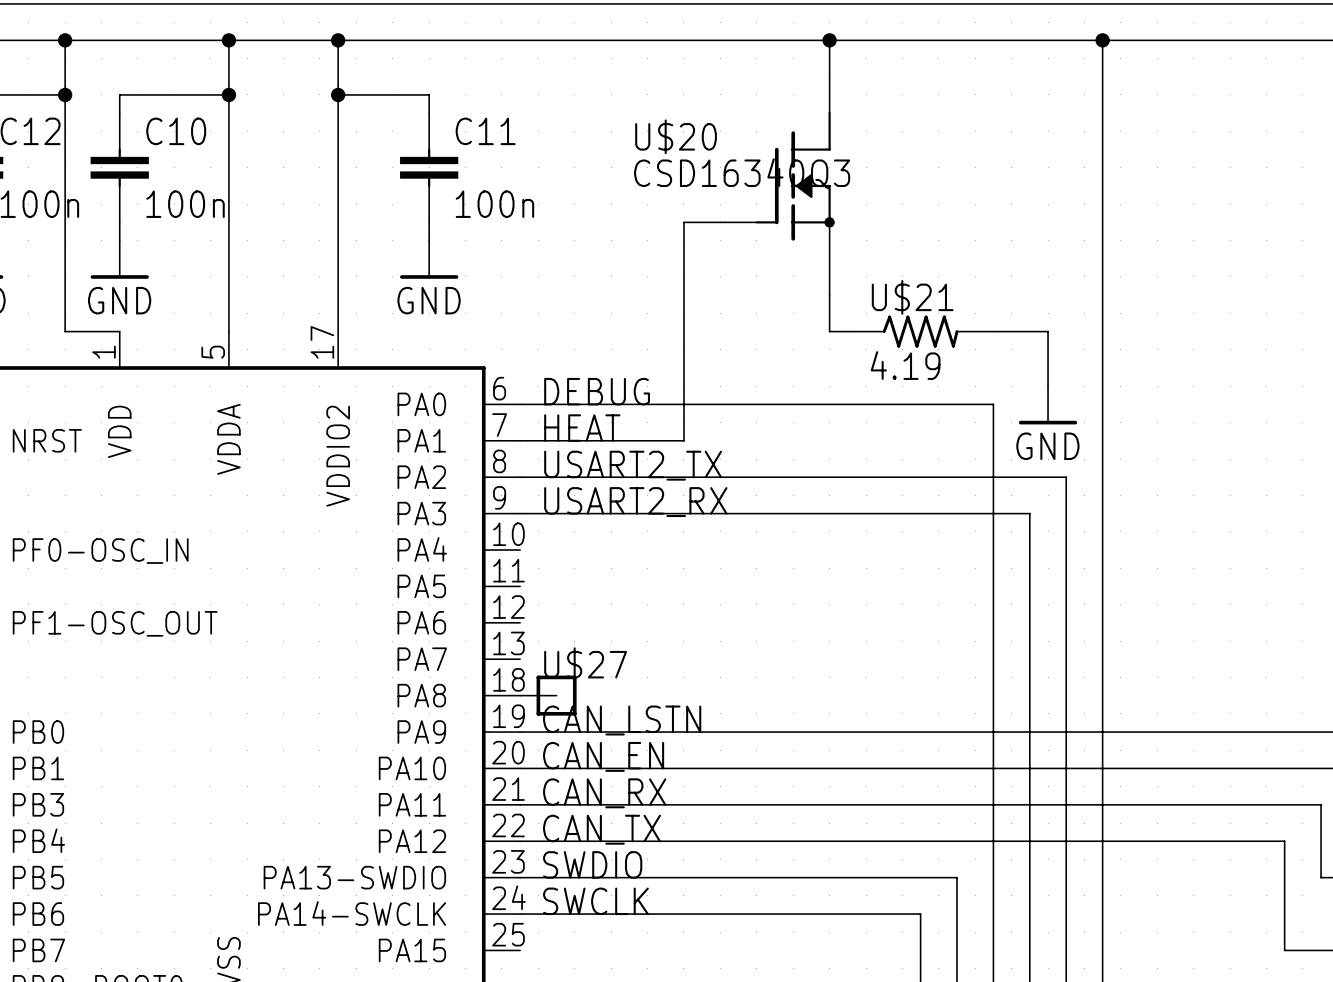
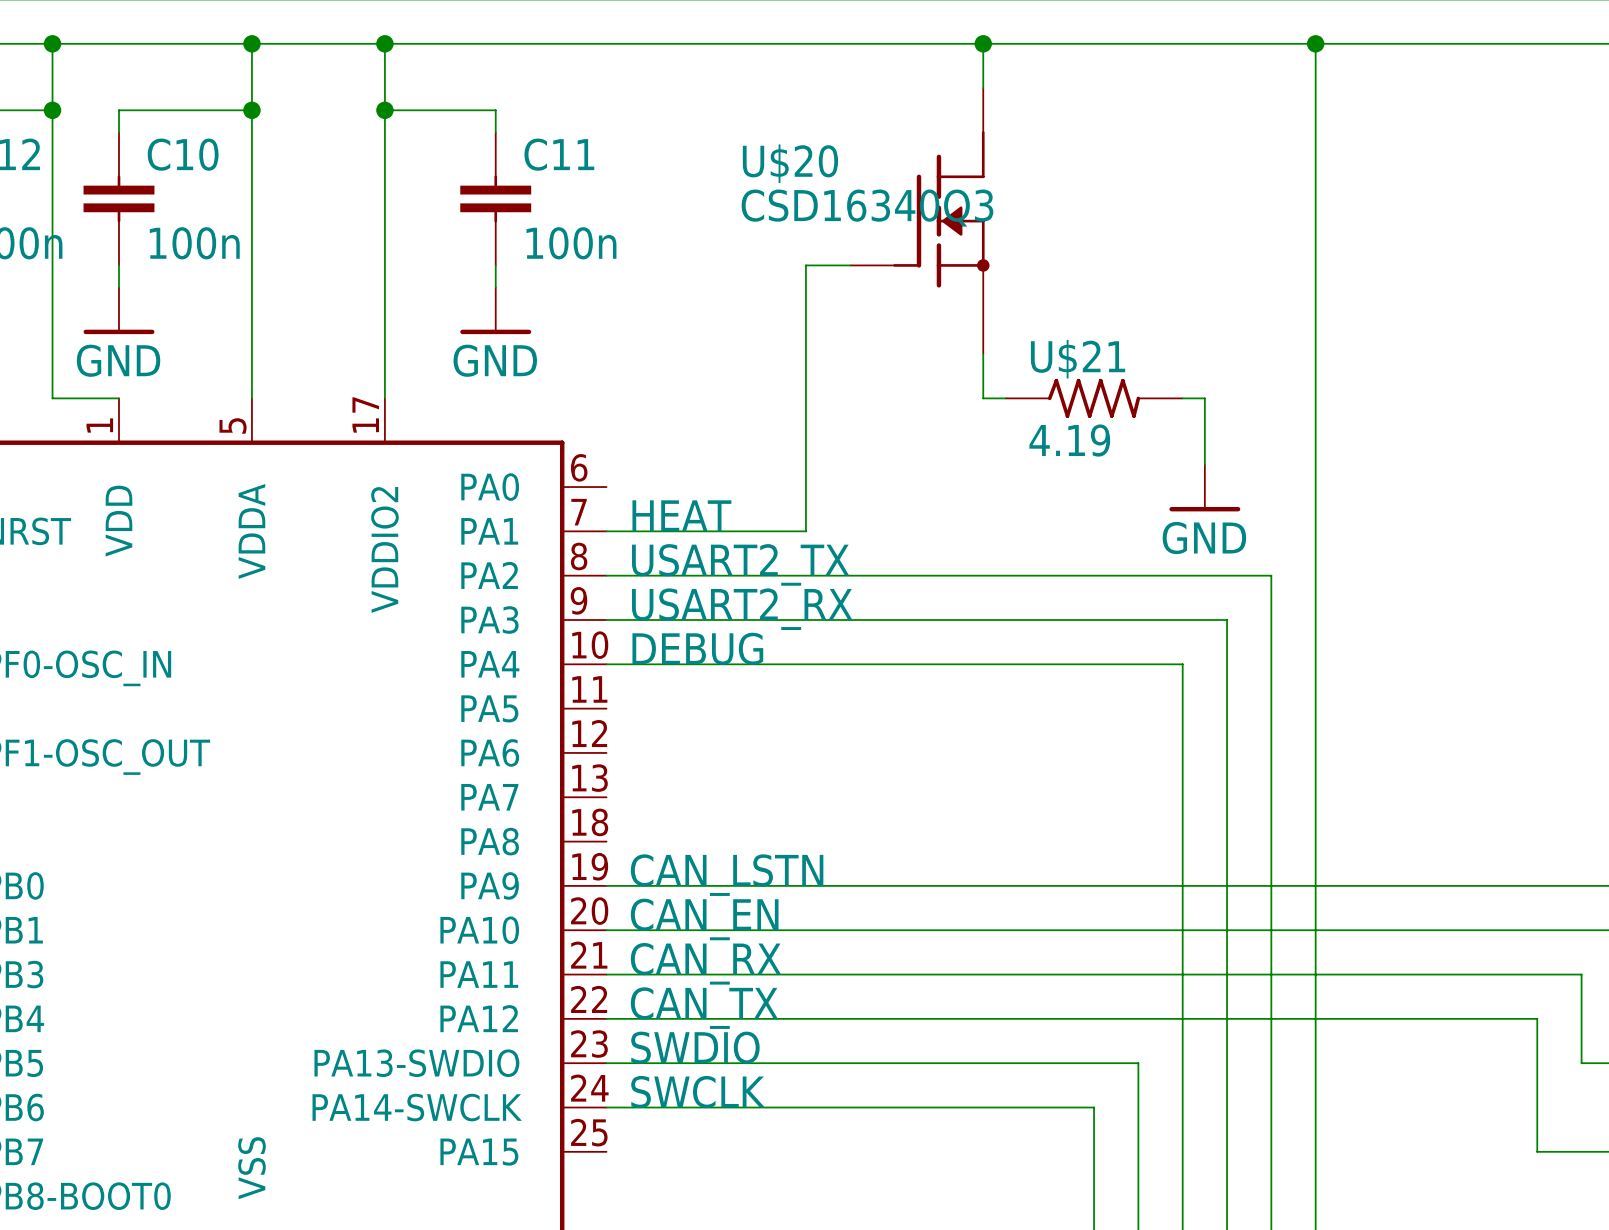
wire: (1011, 331) (1048, 331) (1048, 386) -> (1204, 398) (1204, 464)
text position: DEBUG (597, 391) -> DEBUG (697, 648)
wire: (520, 404) (993, 404) (993, 550) -> (606, 664) (1182, 664)
power symbol position: GND (1048, 405) -> GND (1204, 488)
wire: (520, 695) (556, 695) -> none
U$27: (556, 695) -> none

